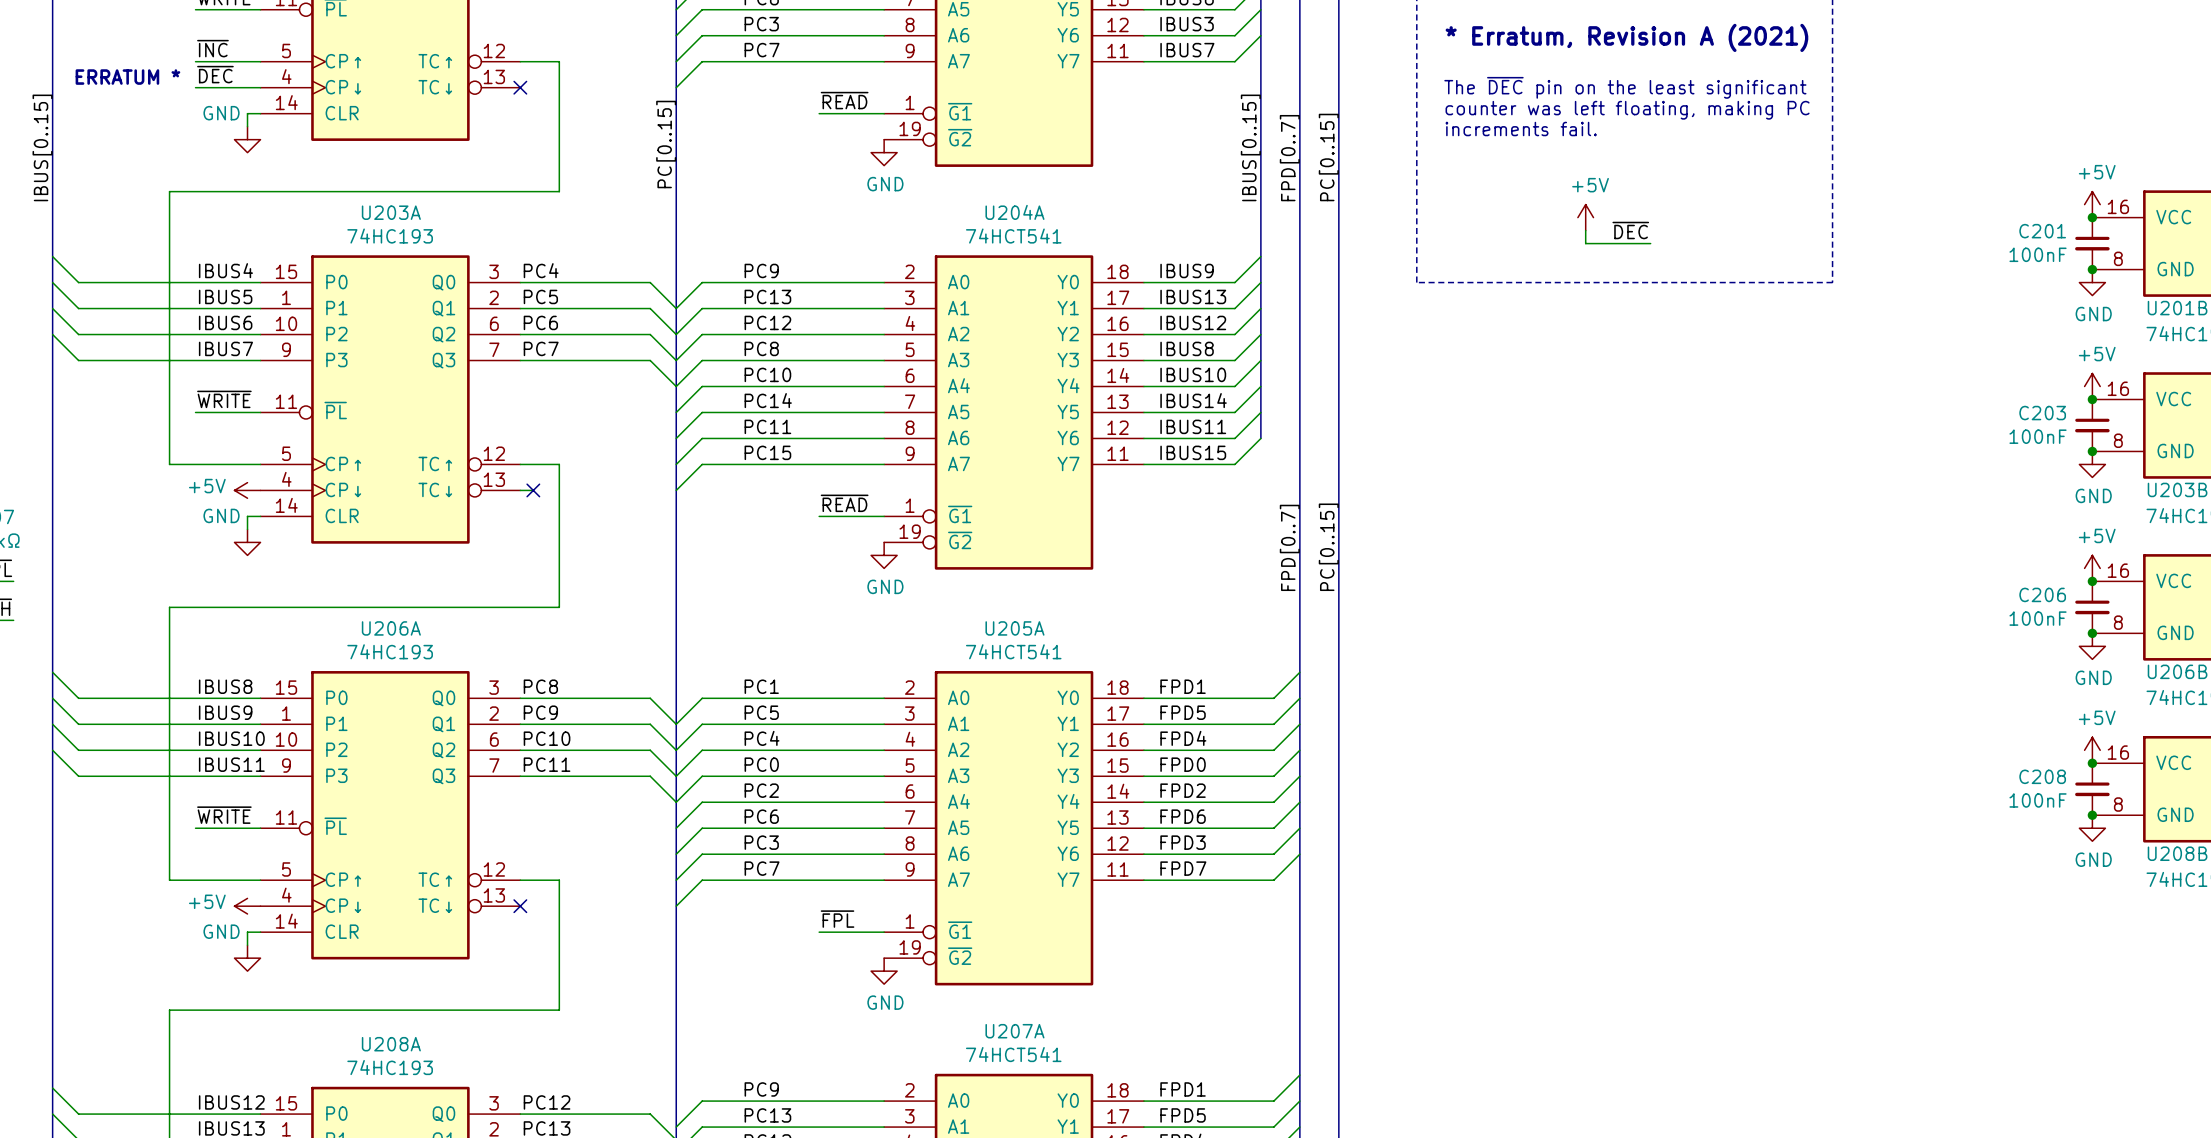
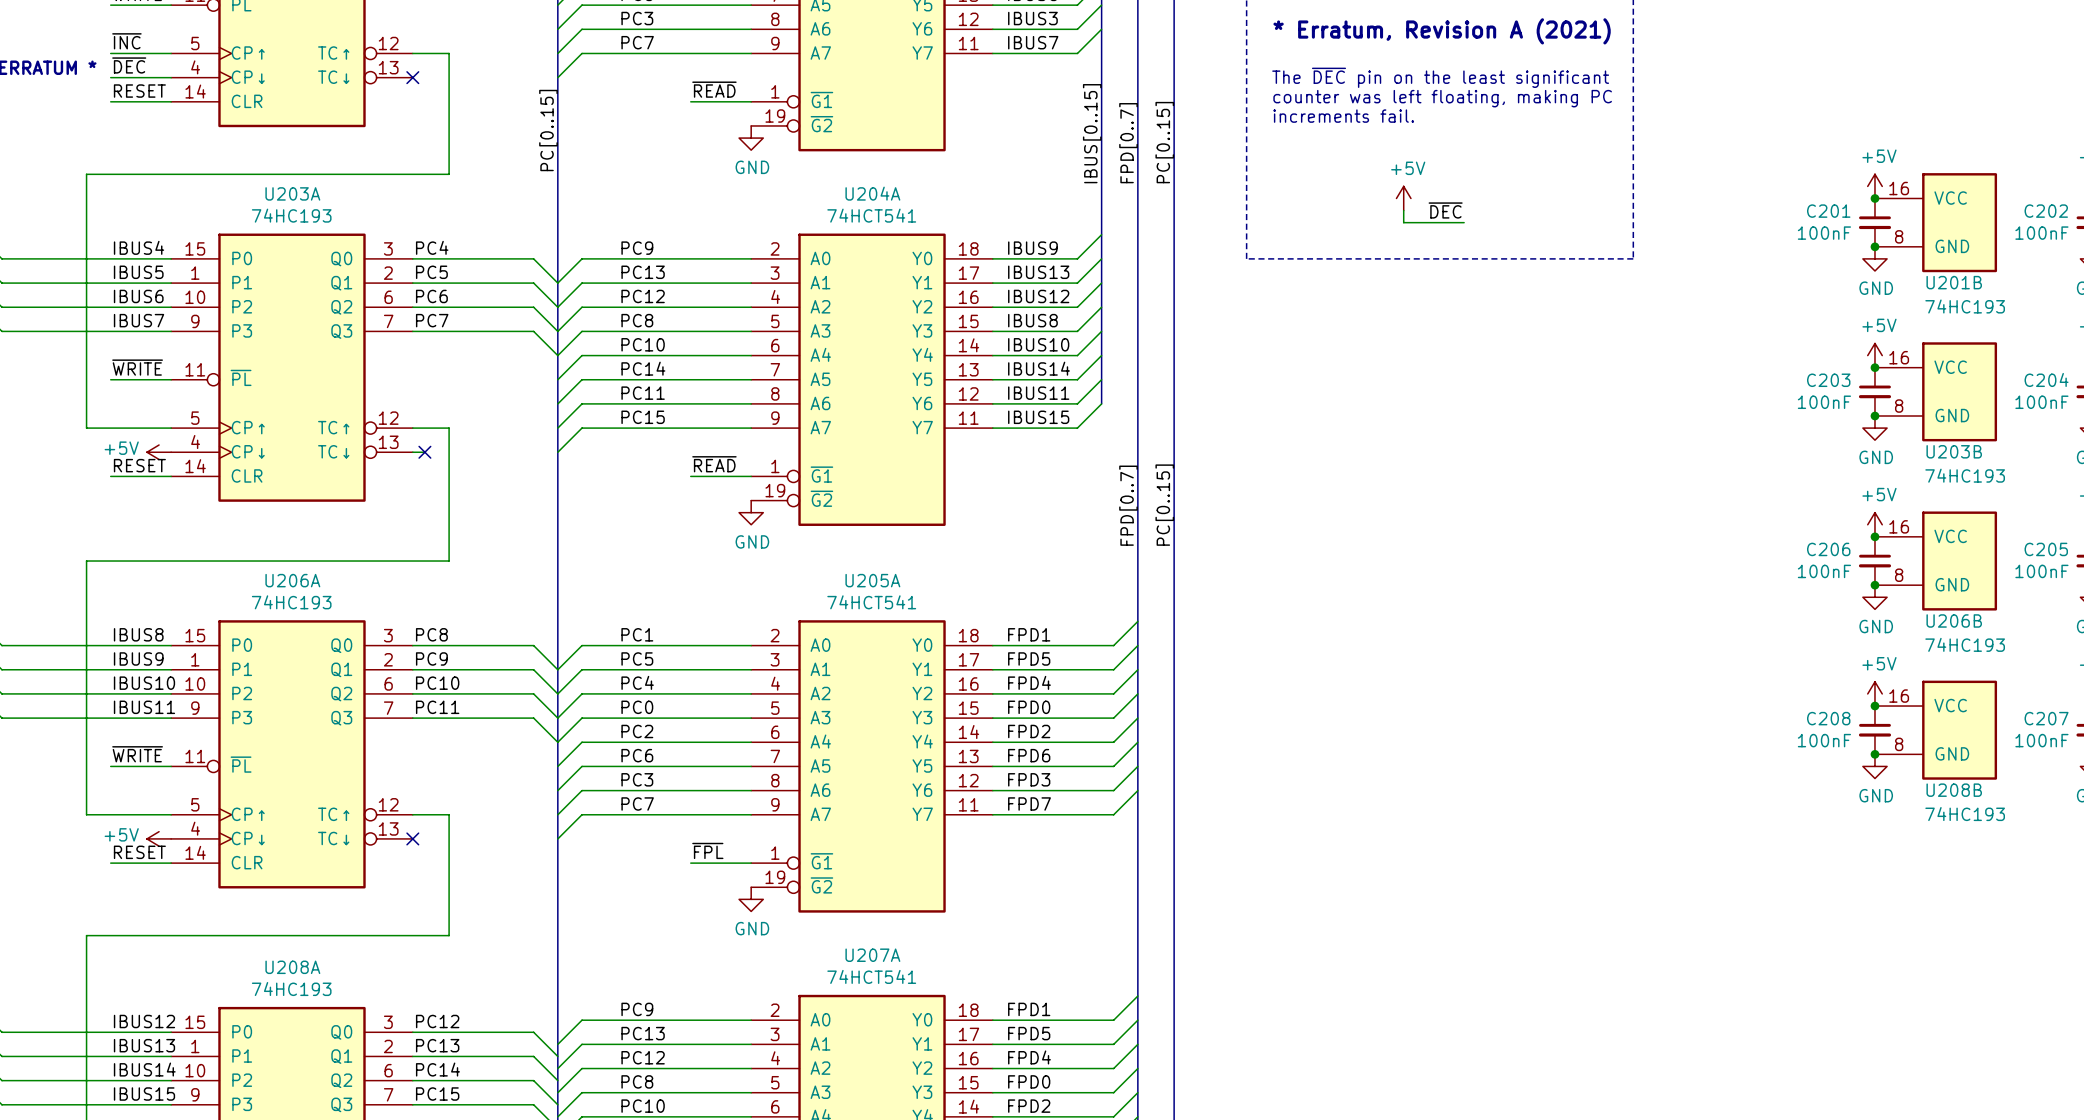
label: none -> RESET (139, 91)
wire: (247, 113) (247, 126) -> (159, 101) (110, 101)
power symbol: GND (247, 139) -> none
label: none -> RESET (139, 465)
wire: (247, 516) (247, 529) -> (159, 476) (110, 476)
power symbol: GND (247, 542) -> none
label: none -> RESET (139, 852)
wire: (247, 932) (247, 945) -> (159, 863) (110, 863)
power symbol: GND (247, 958) -> none

